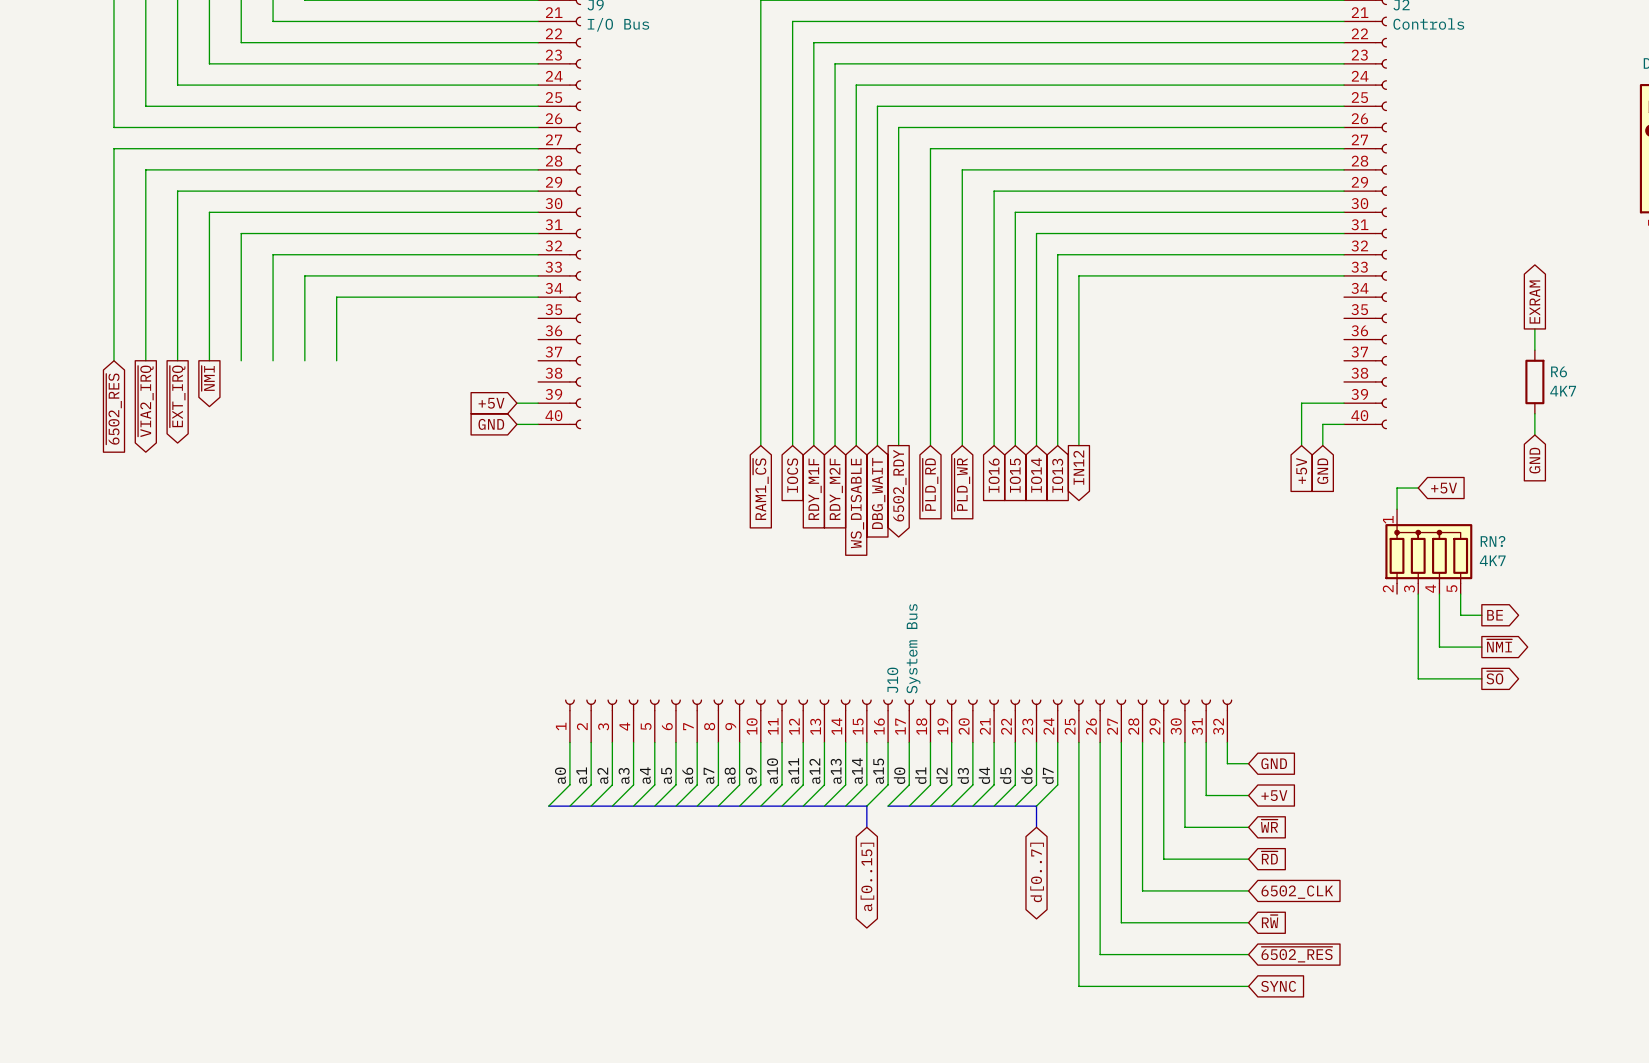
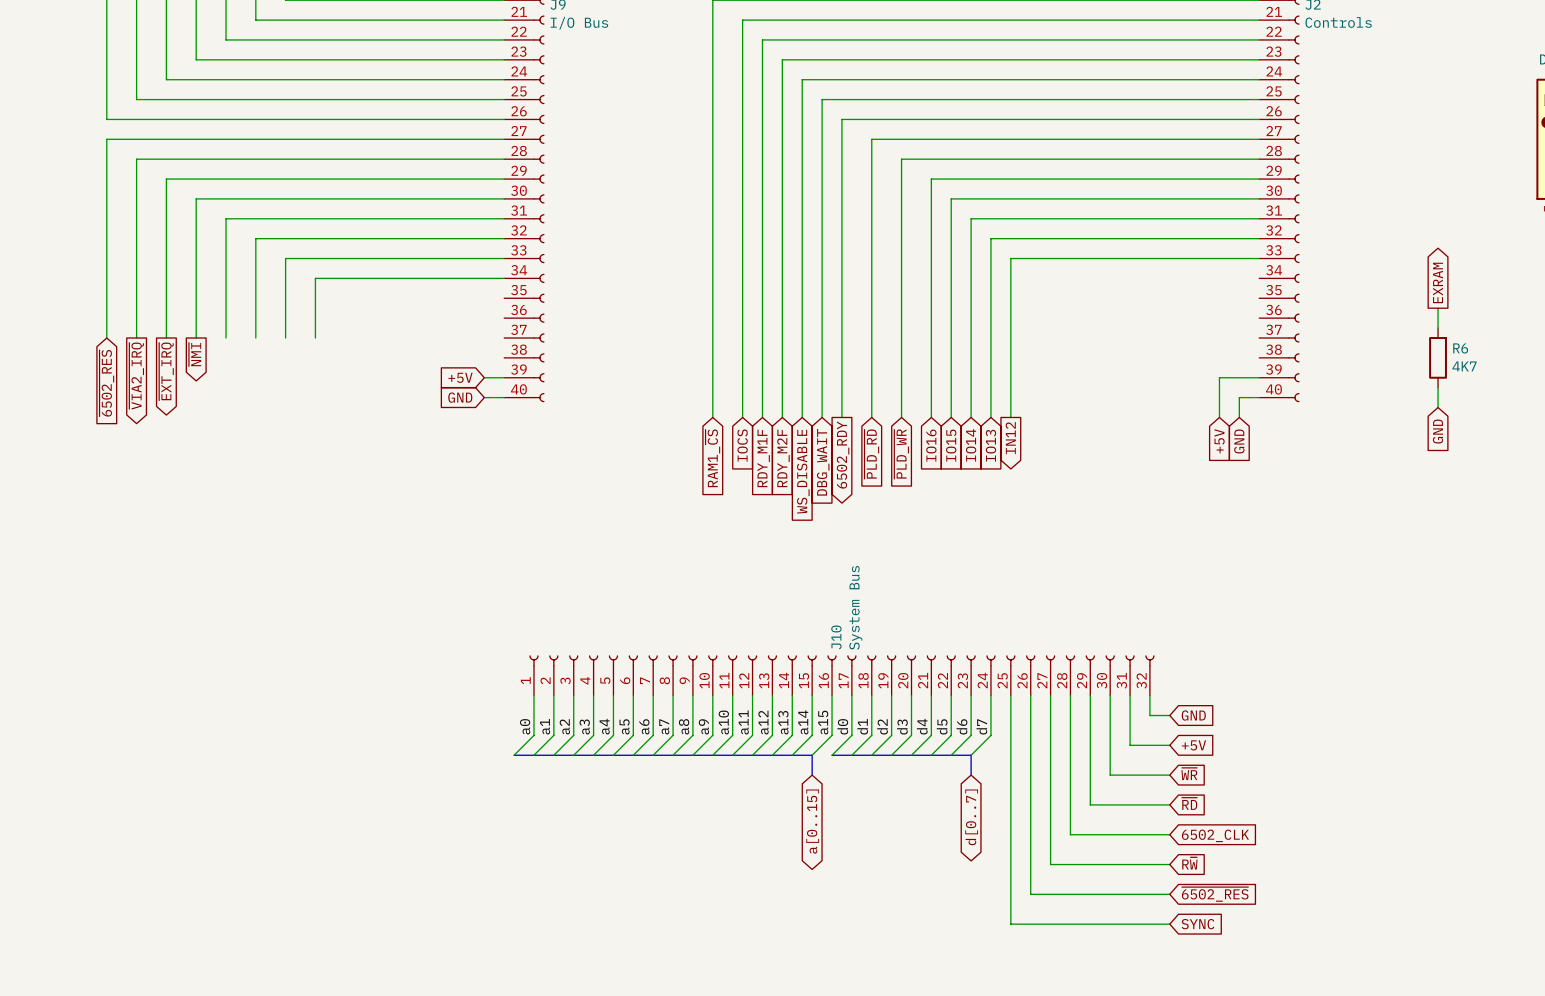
wire: (1418, 488) (1397, 488) (1397, 509) -> none
global label: +5V (1444, 488) -> none
RN?: 4K7 (1428, 551) -> none
wire: (1418, 594) (1418, 678) (1481, 678) -> none
wire: (1439, 594) (1439, 647) (1481, 647) -> none
wire: (1460, 594) (1460, 615) (1481, 615) -> none
global label: BE (1495, 615) -> none
global label: ~{NMI} (1499, 645) -> none
global label: ~{SO} (1494, 677) -> none

